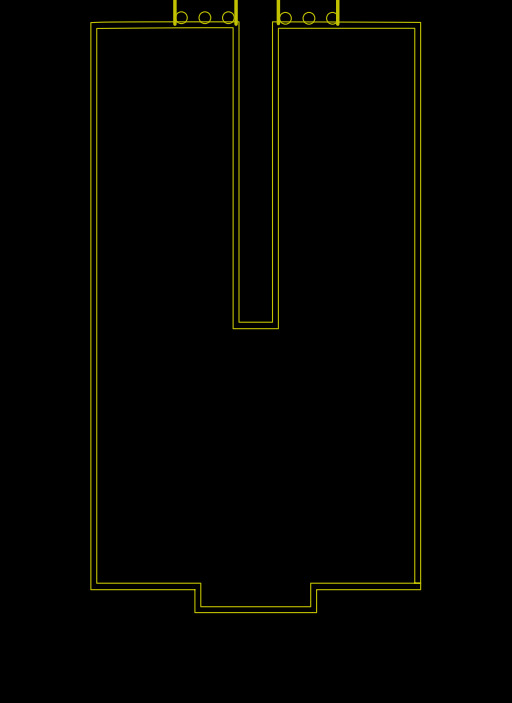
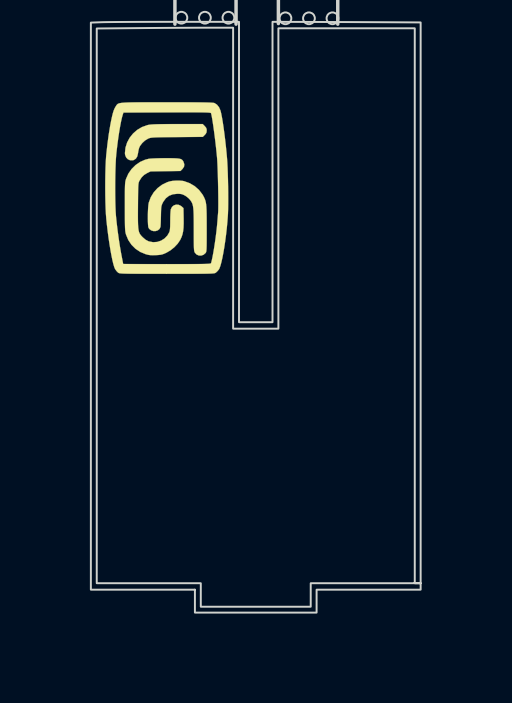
drawing: none -> [105, 102, 229, 274]

